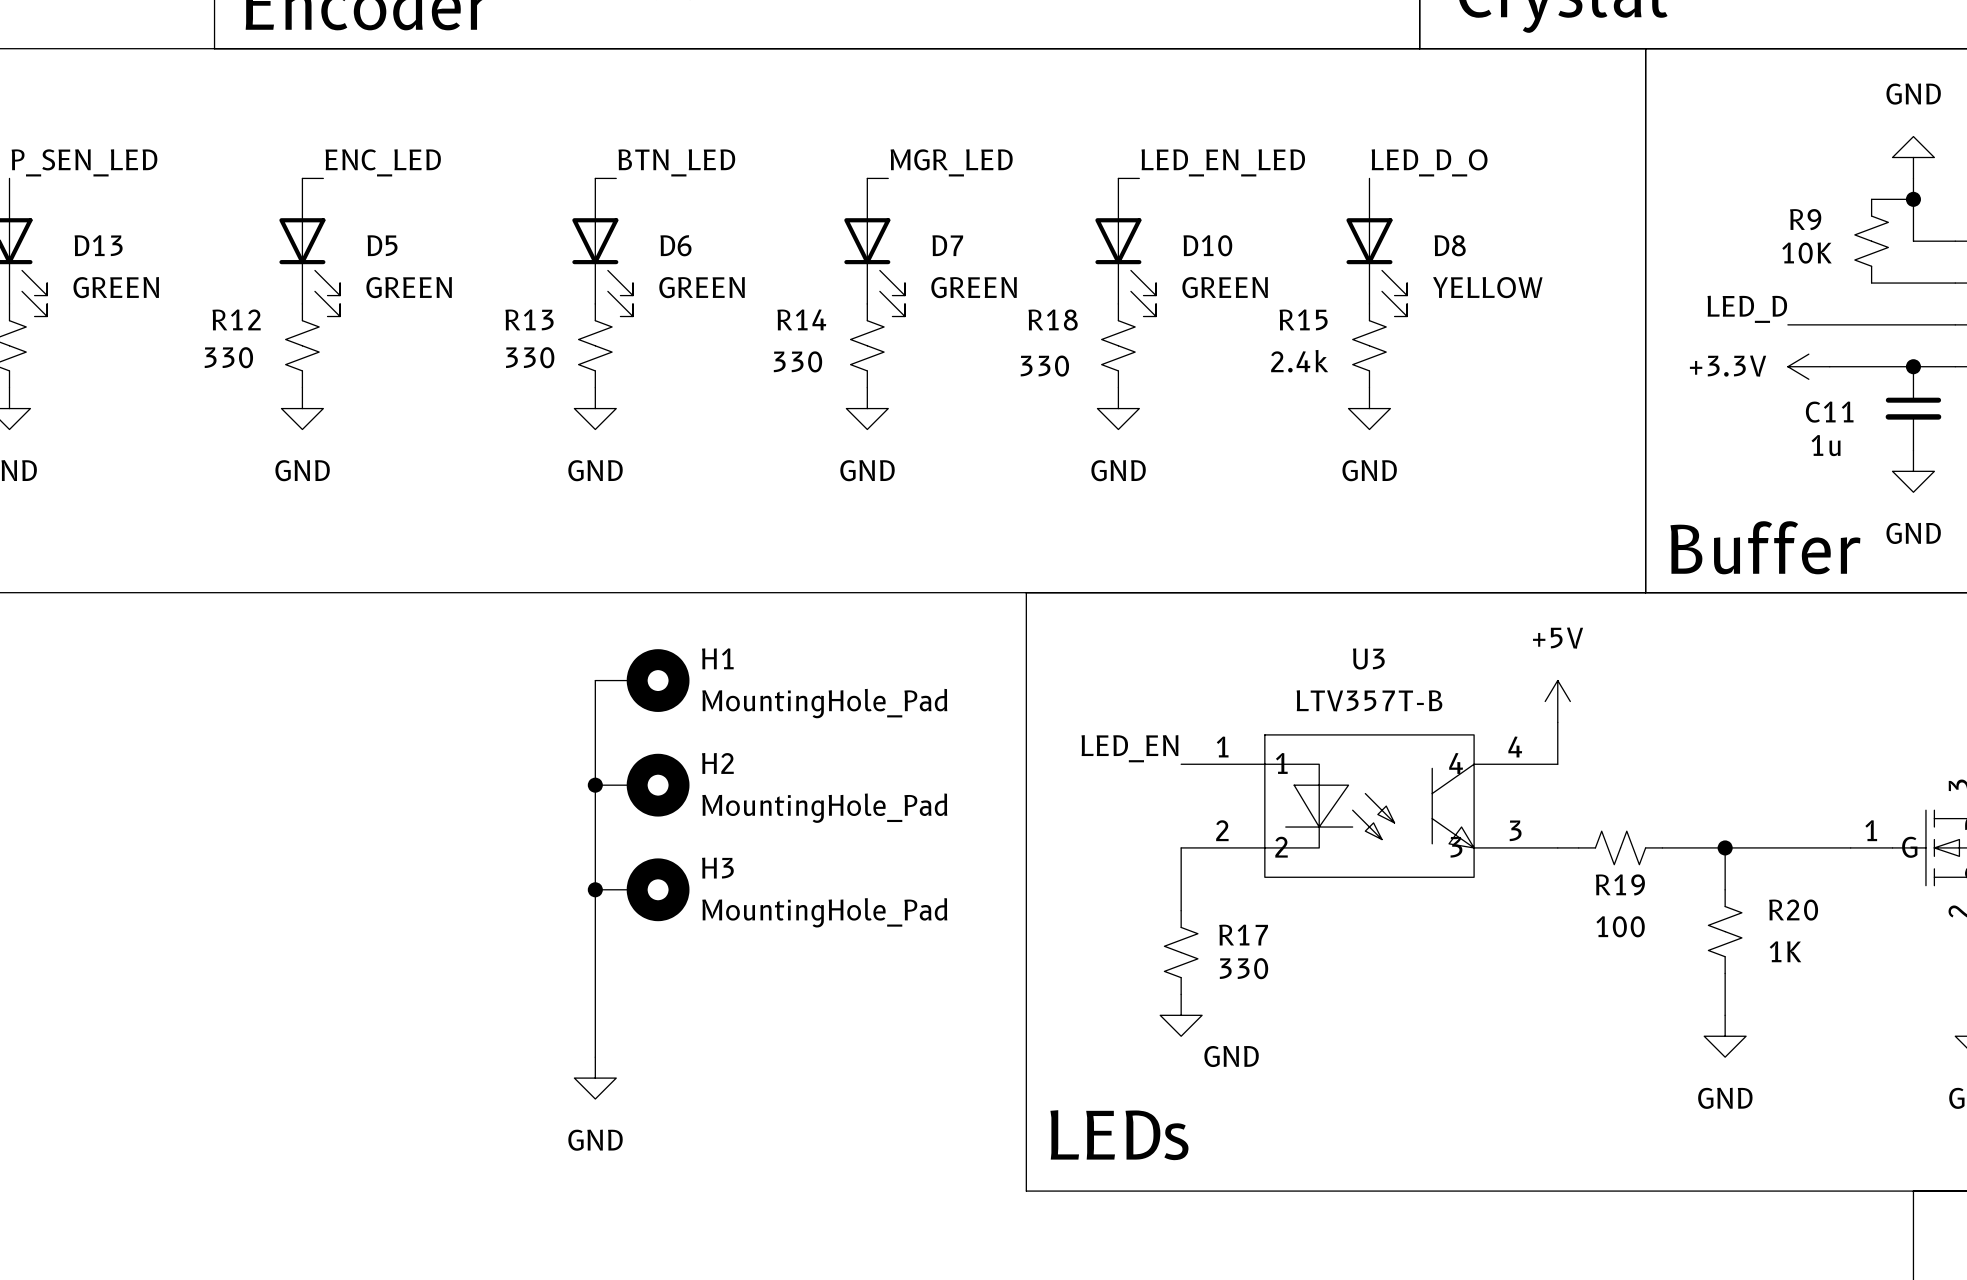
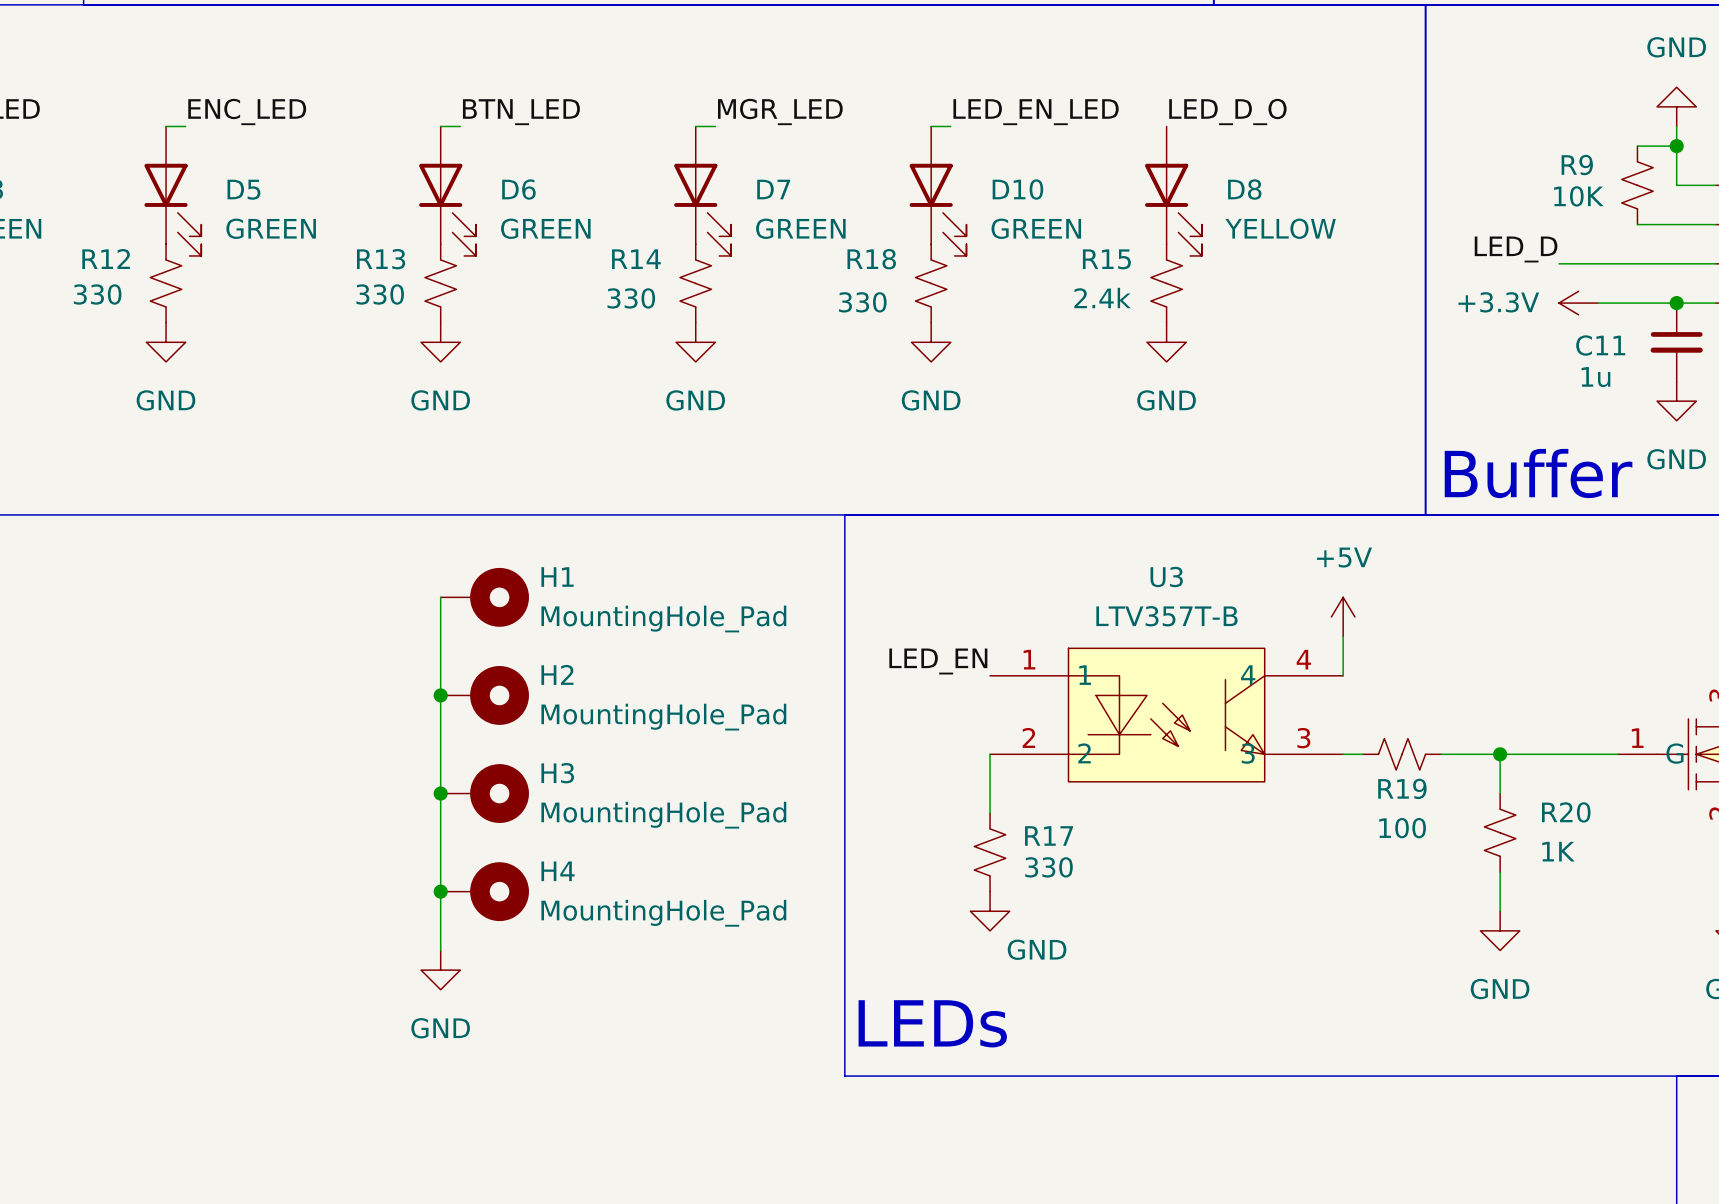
junction: none -> (440, 891)
H4: none -> MountingHole_Pad (484, 891)

